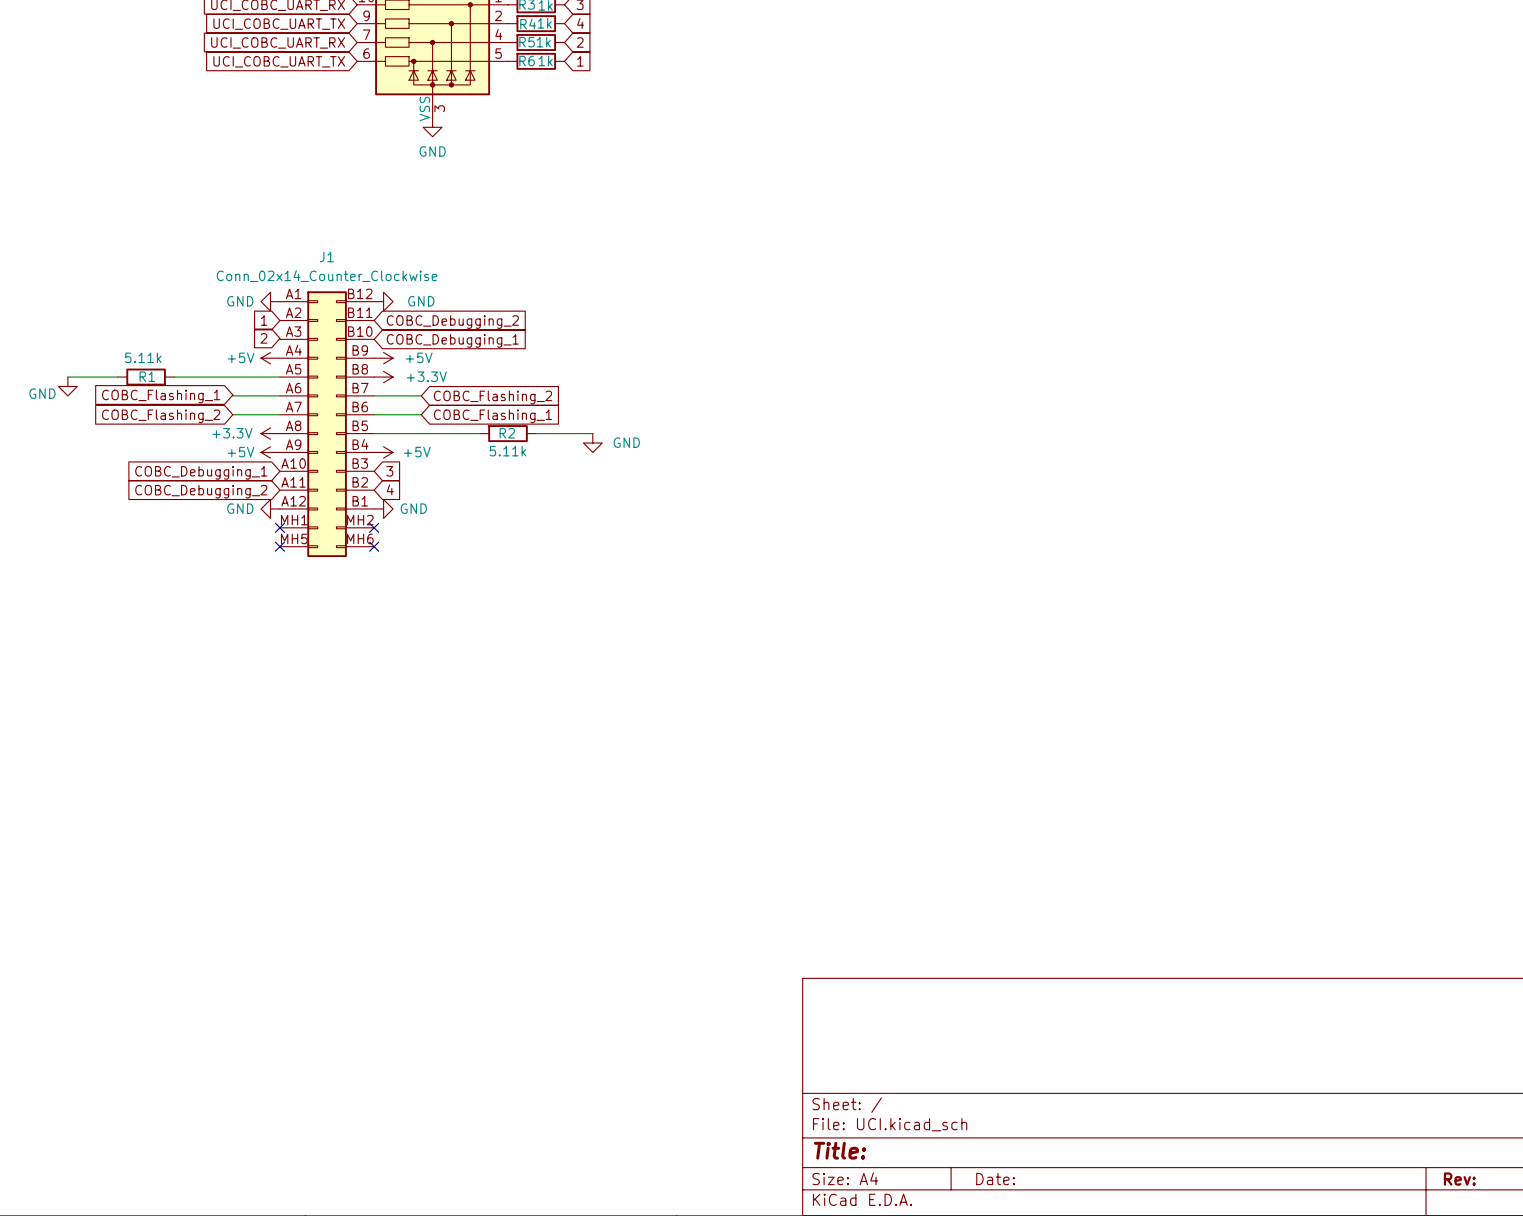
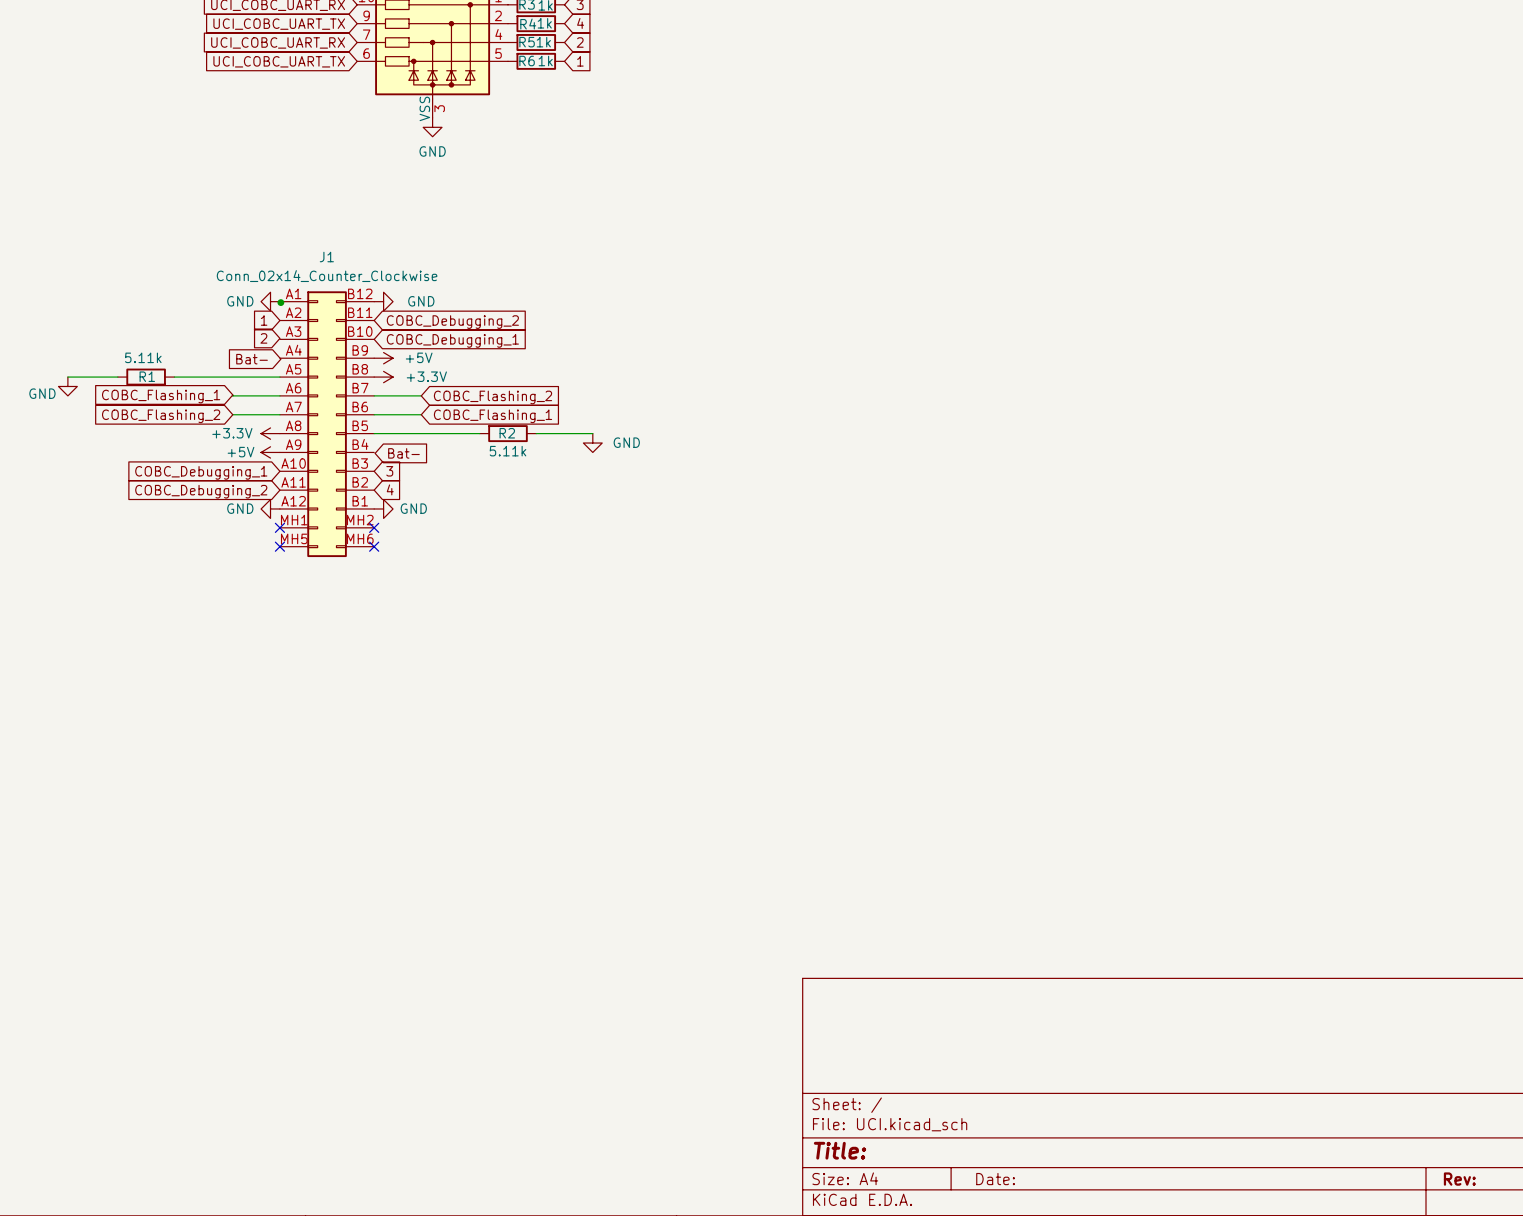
junction: none -> (280, 302)
power symbol: +5V (270, 358) -> none
global label: none -> Bat- (252, 359)
power symbol: +5V (383, 452) -> none
global label: none -> Bat- (403, 453)

